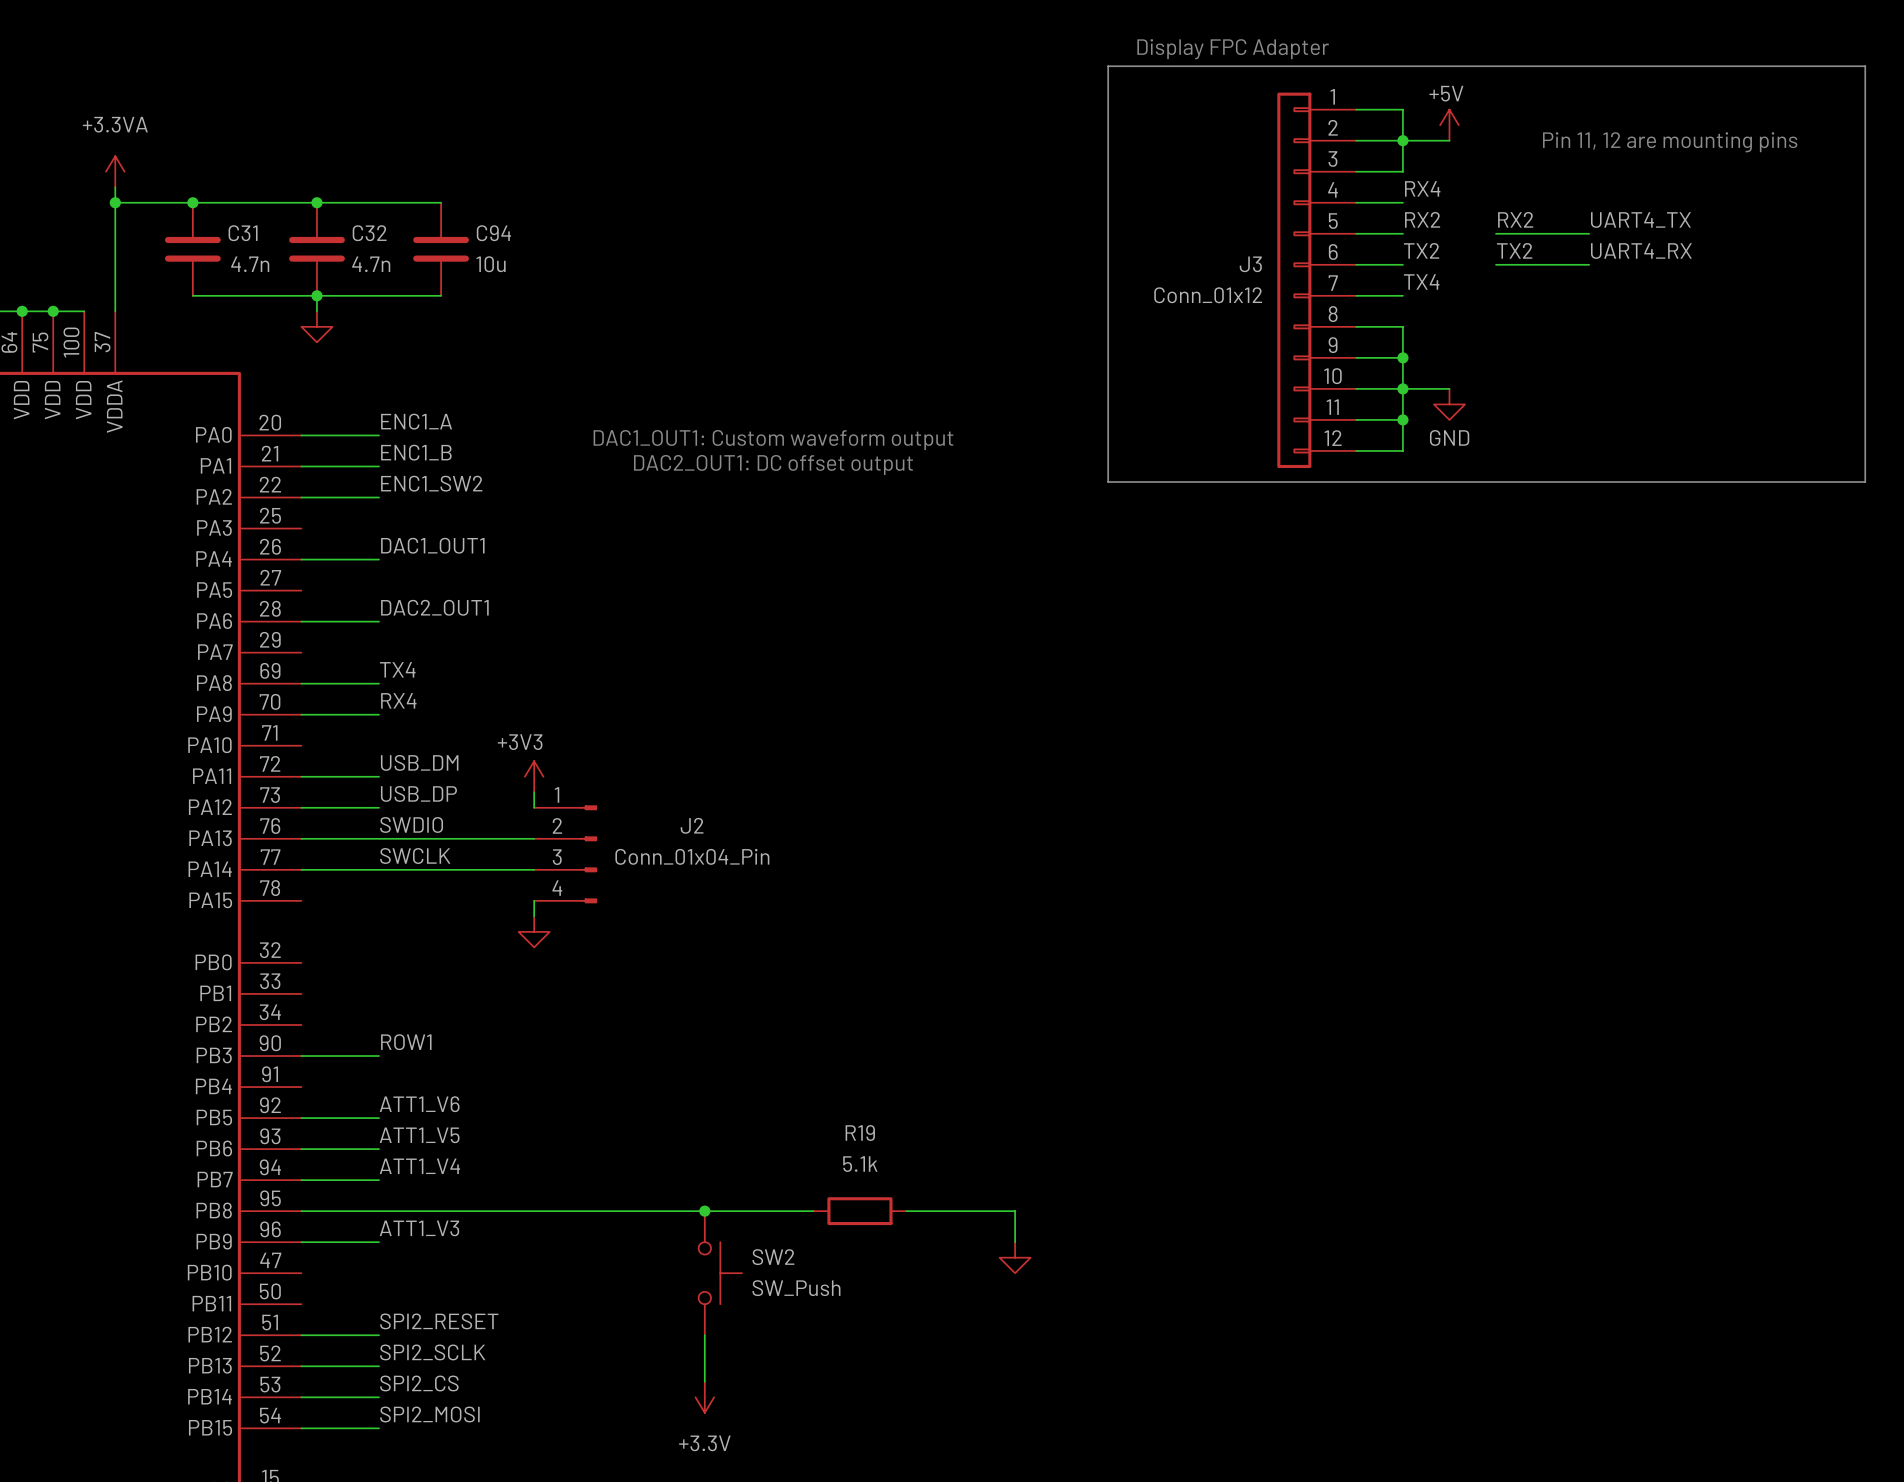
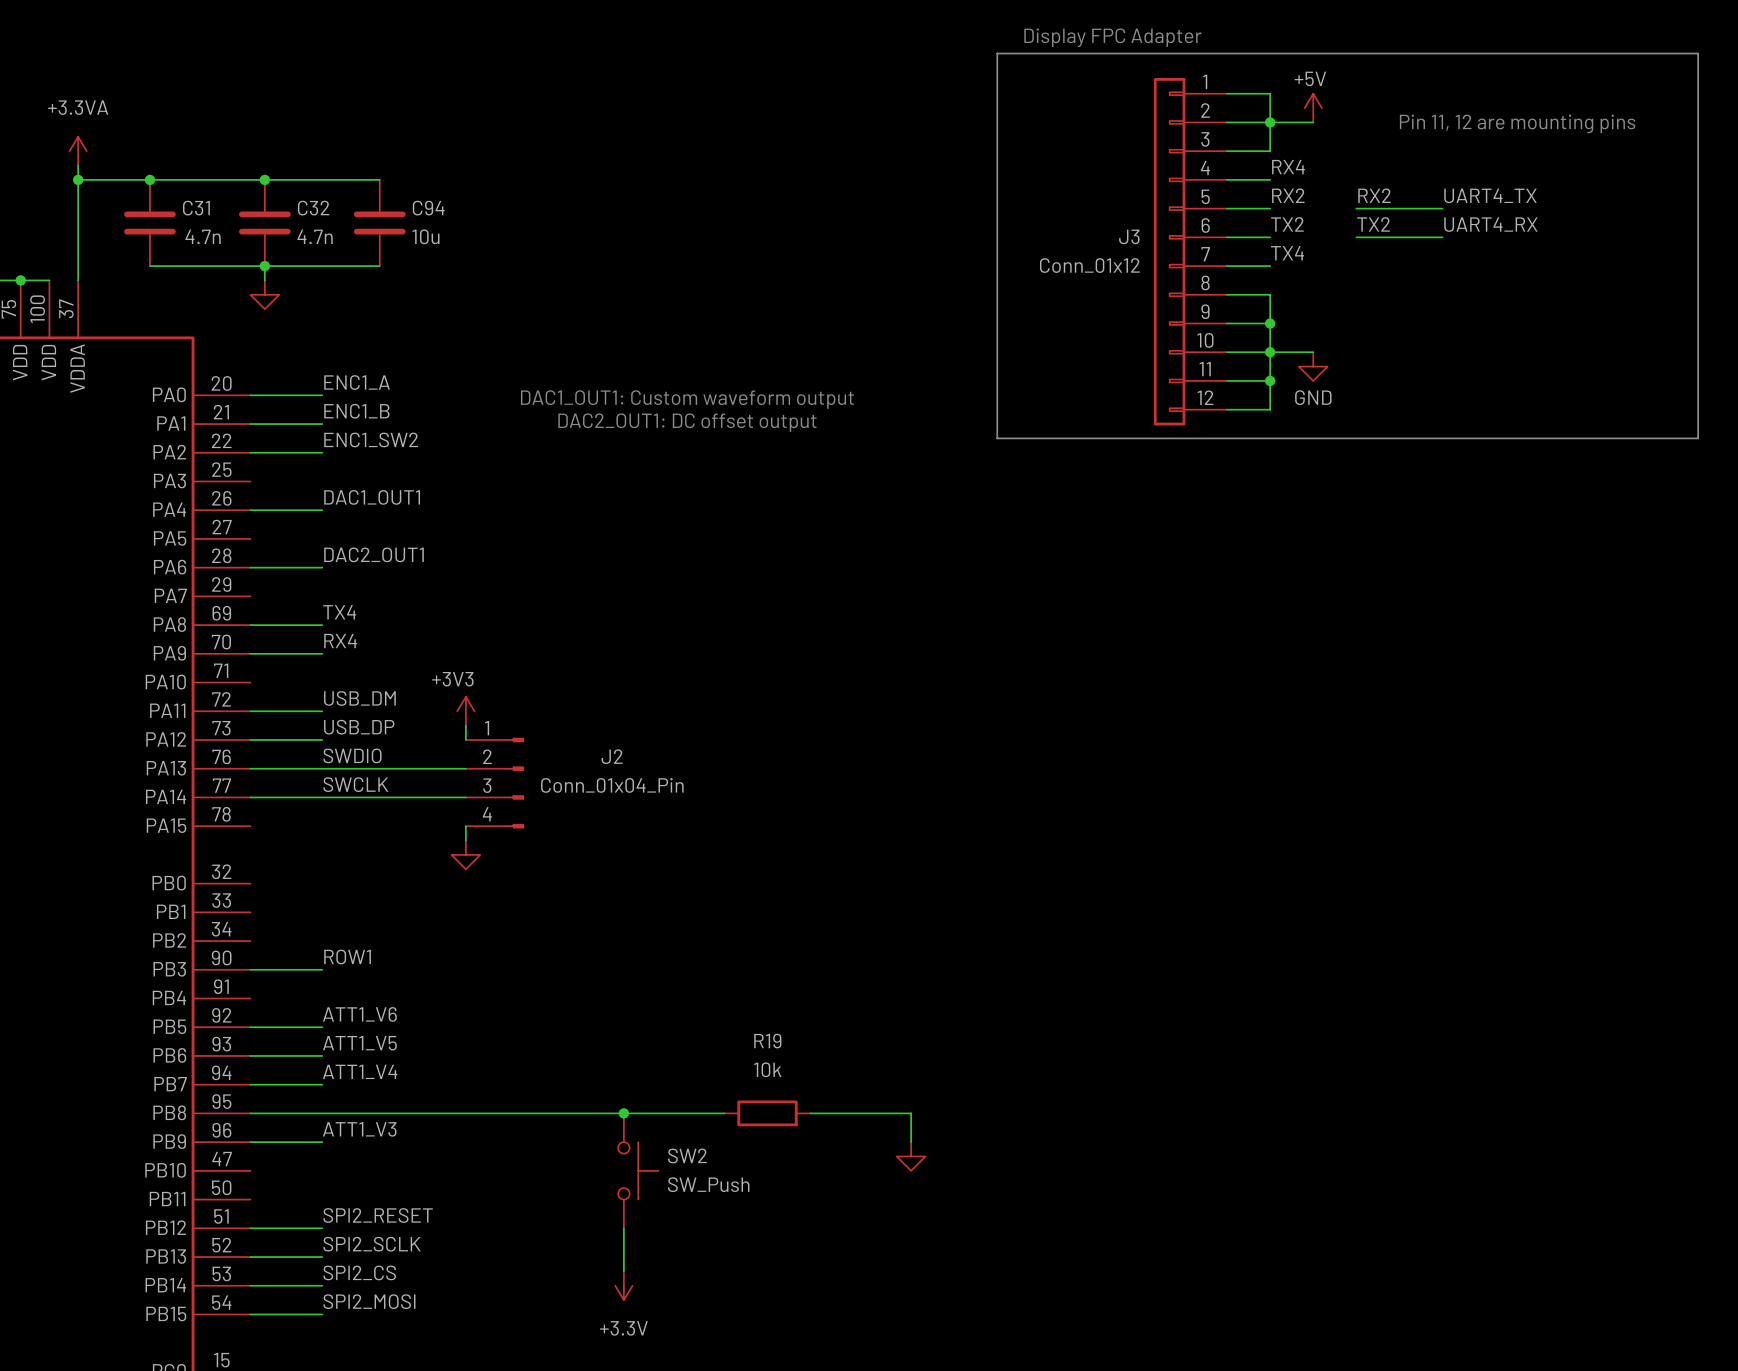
R19 value: 5.1k (860, 1164) -> 10k (767, 1069)

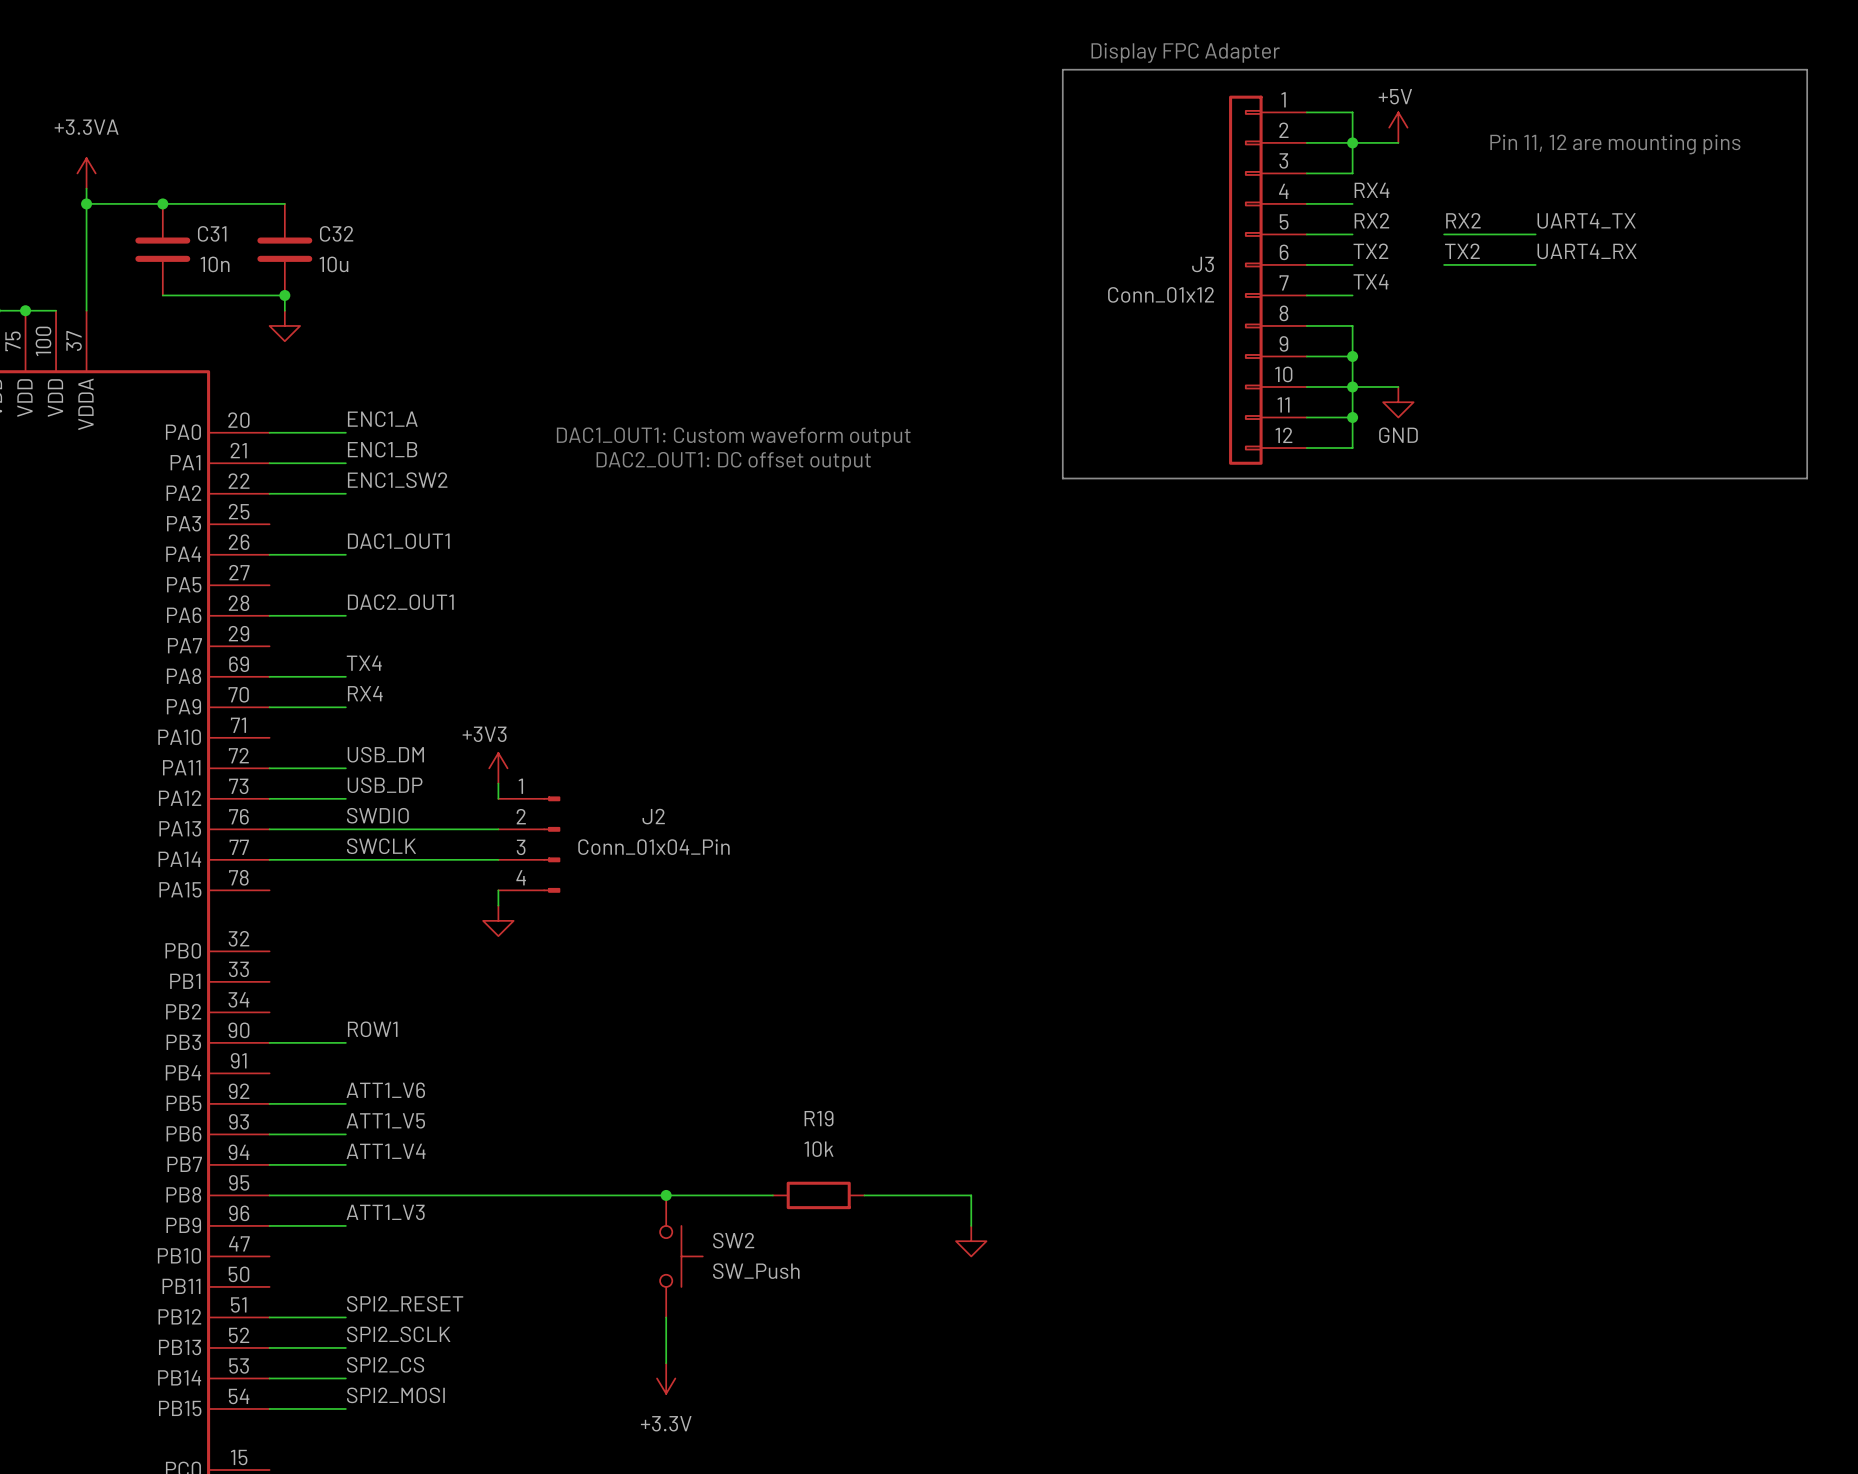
wire: (264, 179) (379, 179) -> none
junction: (264, 179) -> none
C94: 10u (379, 222) -> none
C31 value: 4.7n (203, 236) -> 10n (215, 264)
C32 value: 4.7n (315, 236) -> 10u (333, 264)
wire: (264, 266) (379, 266) -> none

